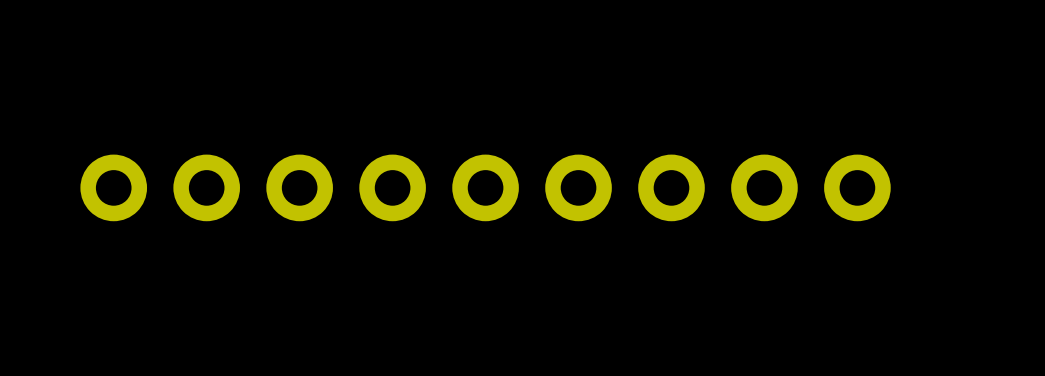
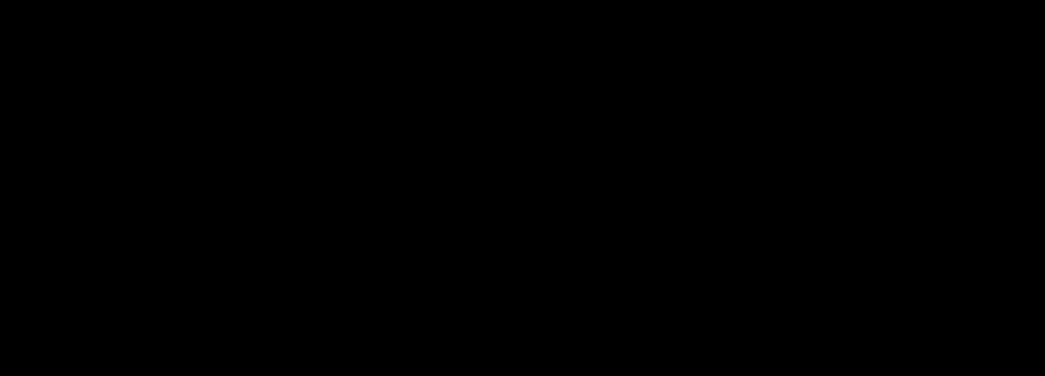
part: (485, 187) -> none

